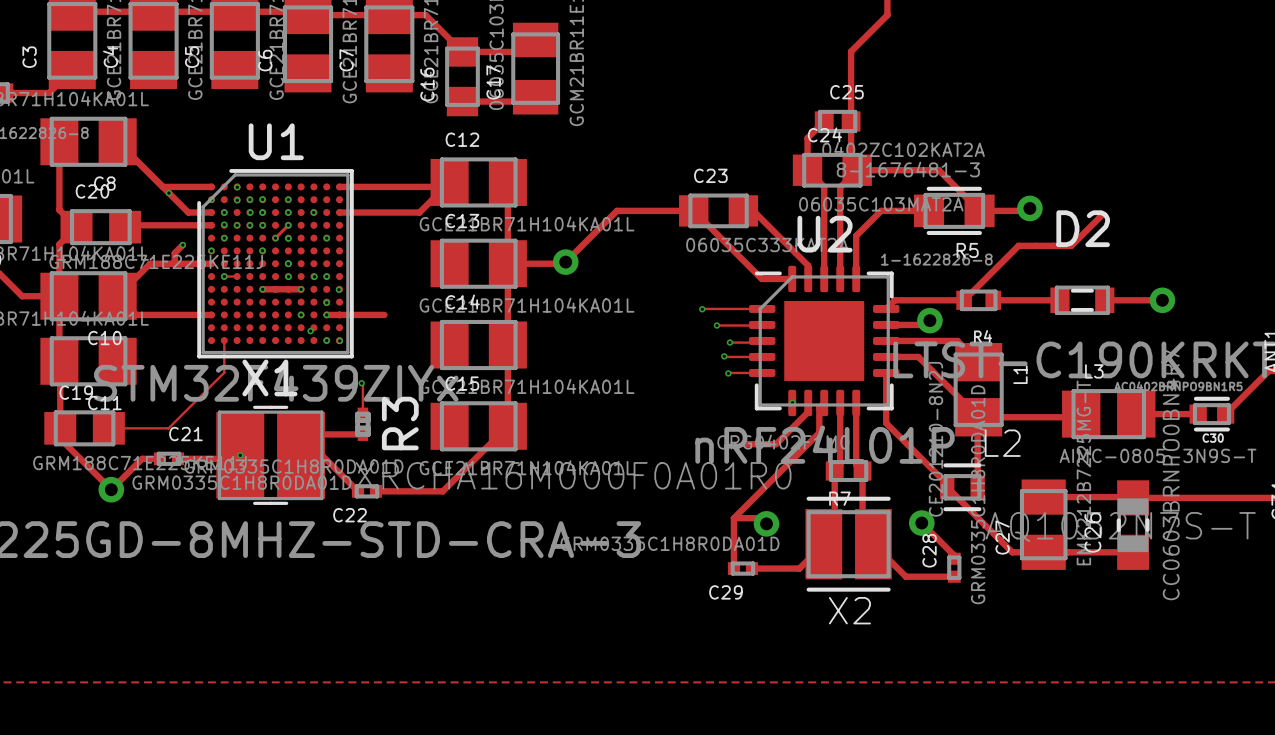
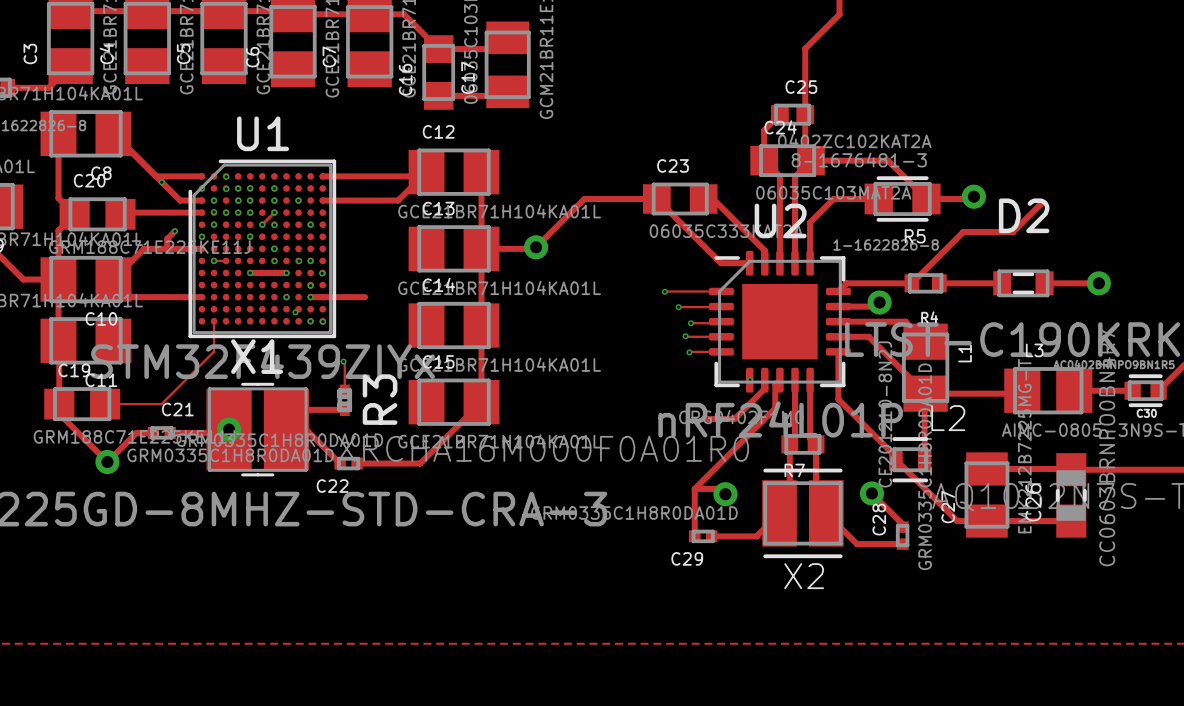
via size: [237, 452, 244, 459] -> [217, 417, 242, 442]

